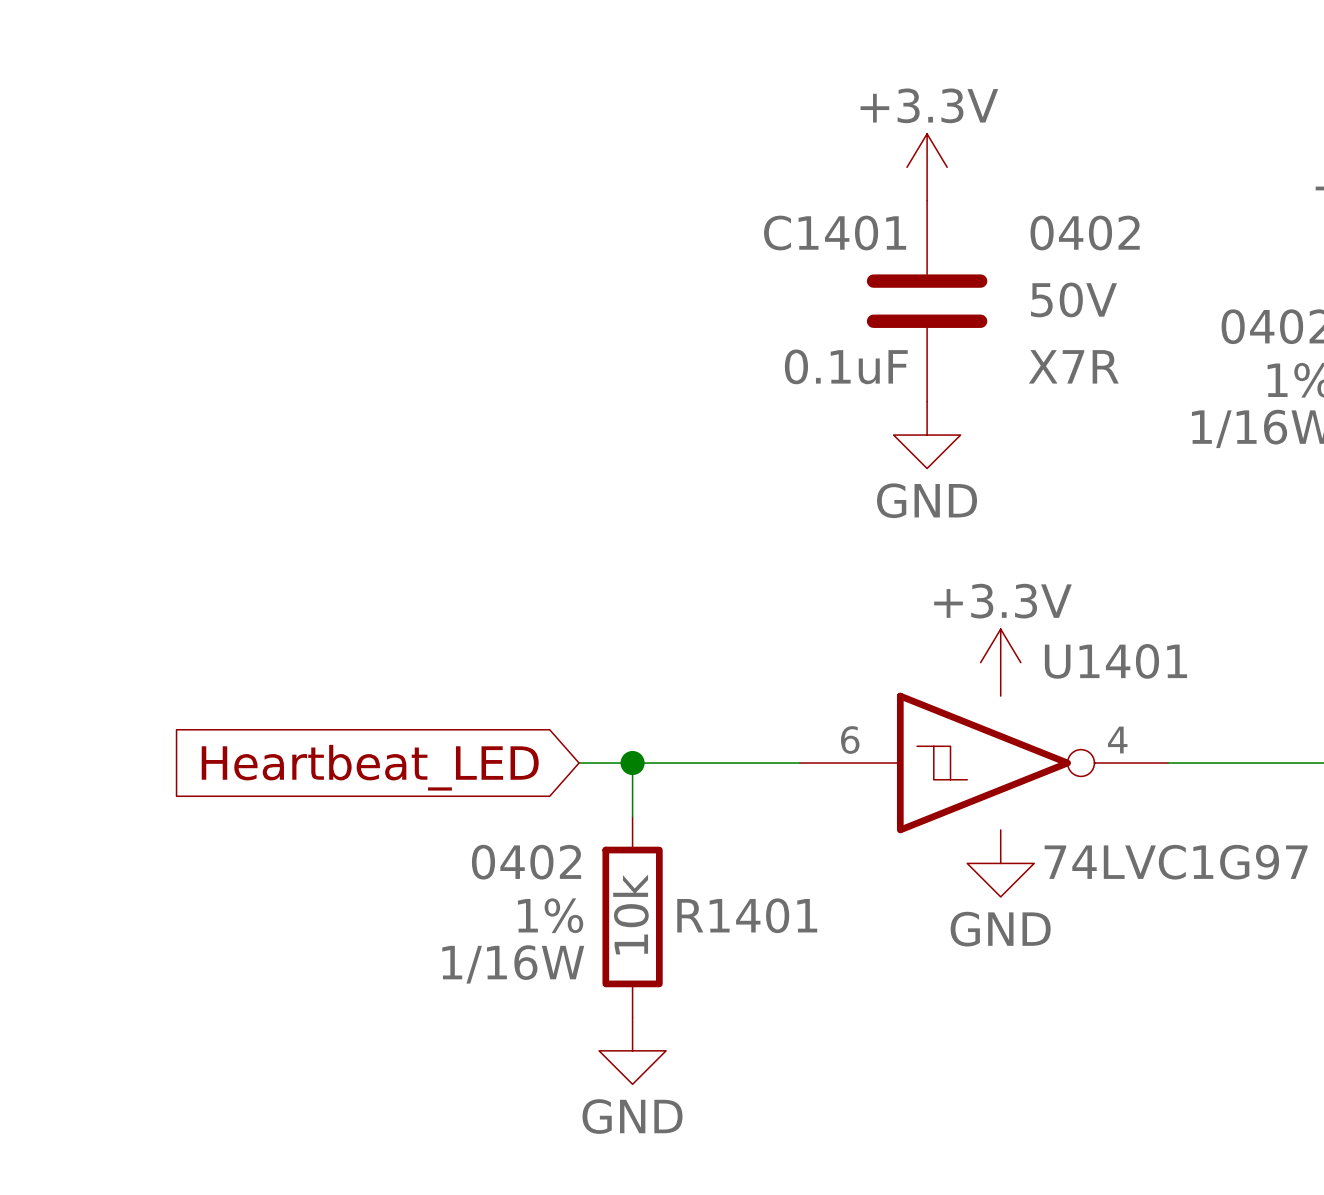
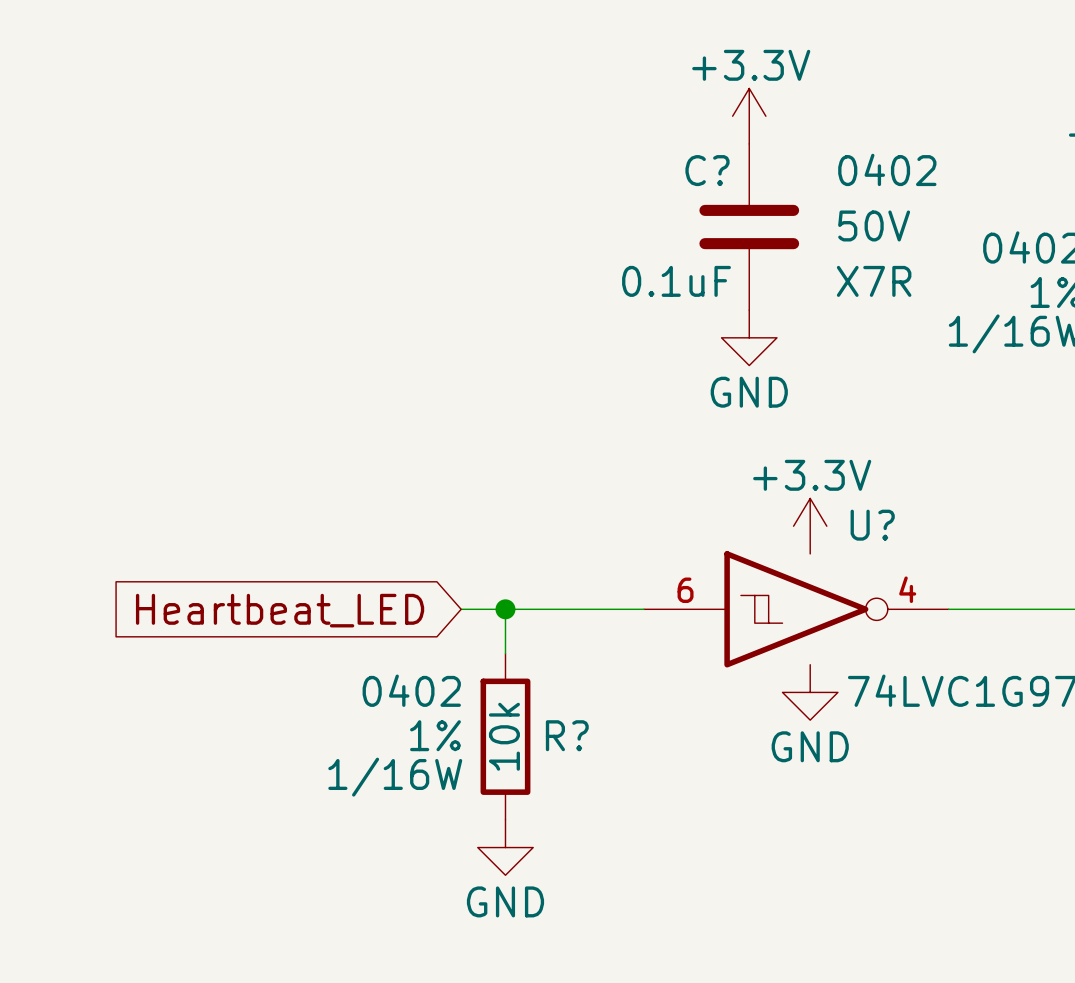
C1401 name: C1401 (835, 233) -> C? (707, 170)
U1401 name: U1401 (1115, 661) -> U? (872, 525)
R1401 name: R1401 (747, 915) -> R? (567, 735)

